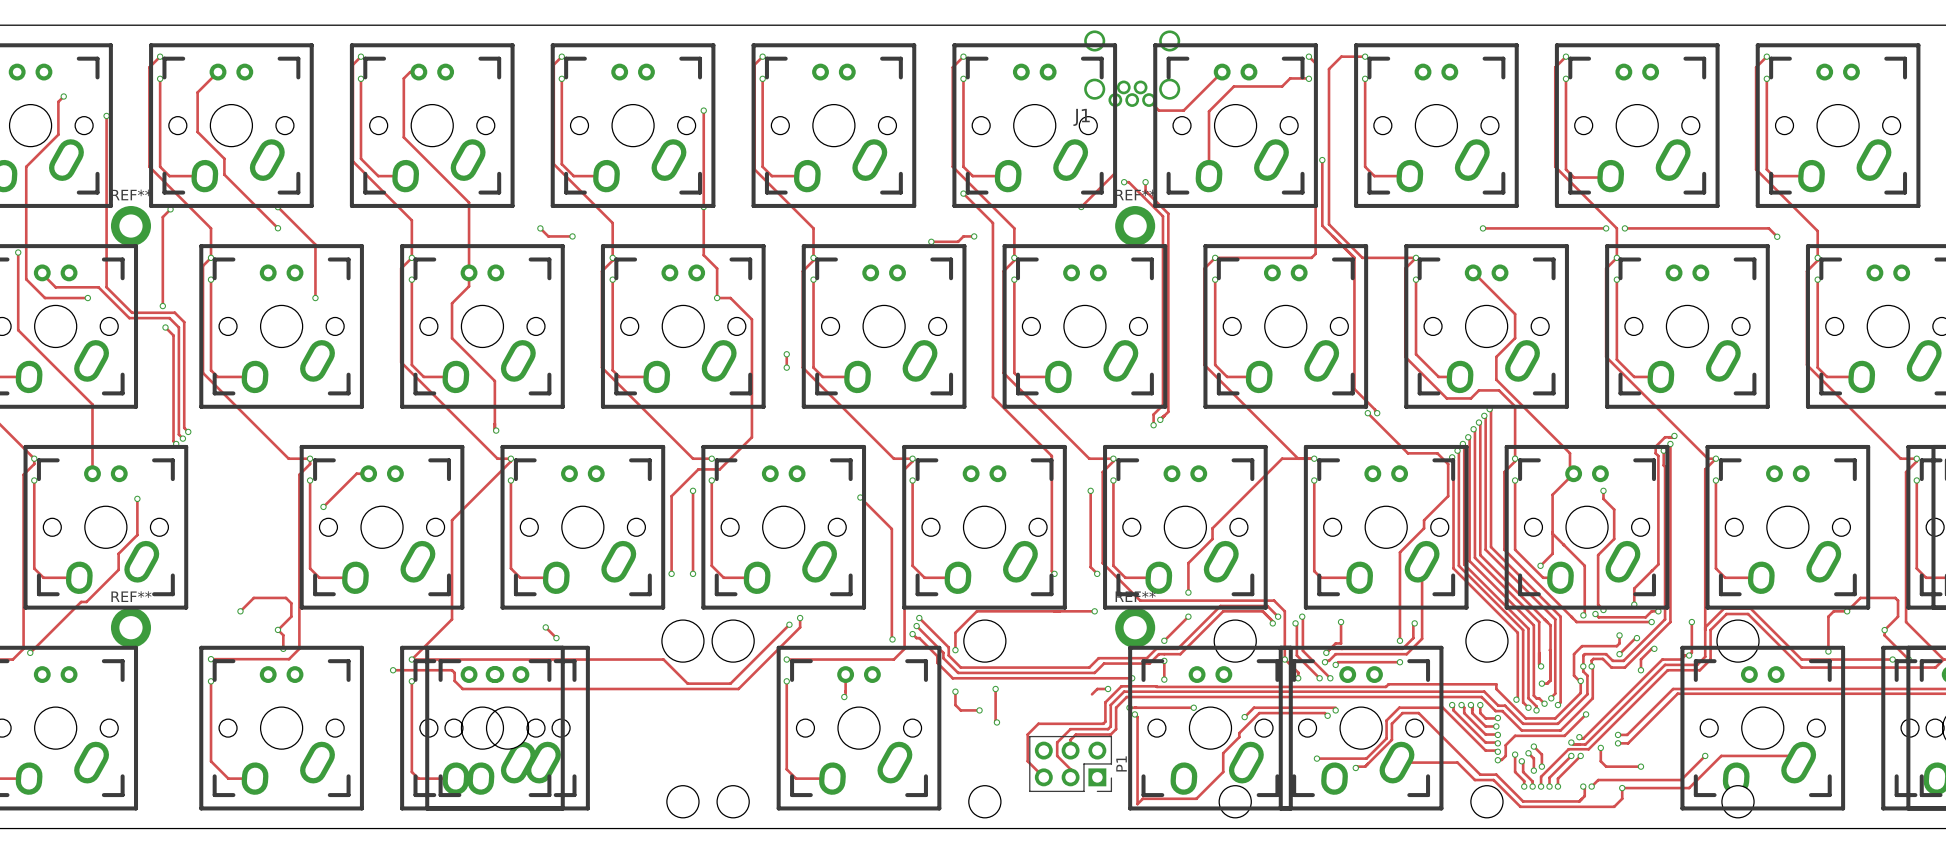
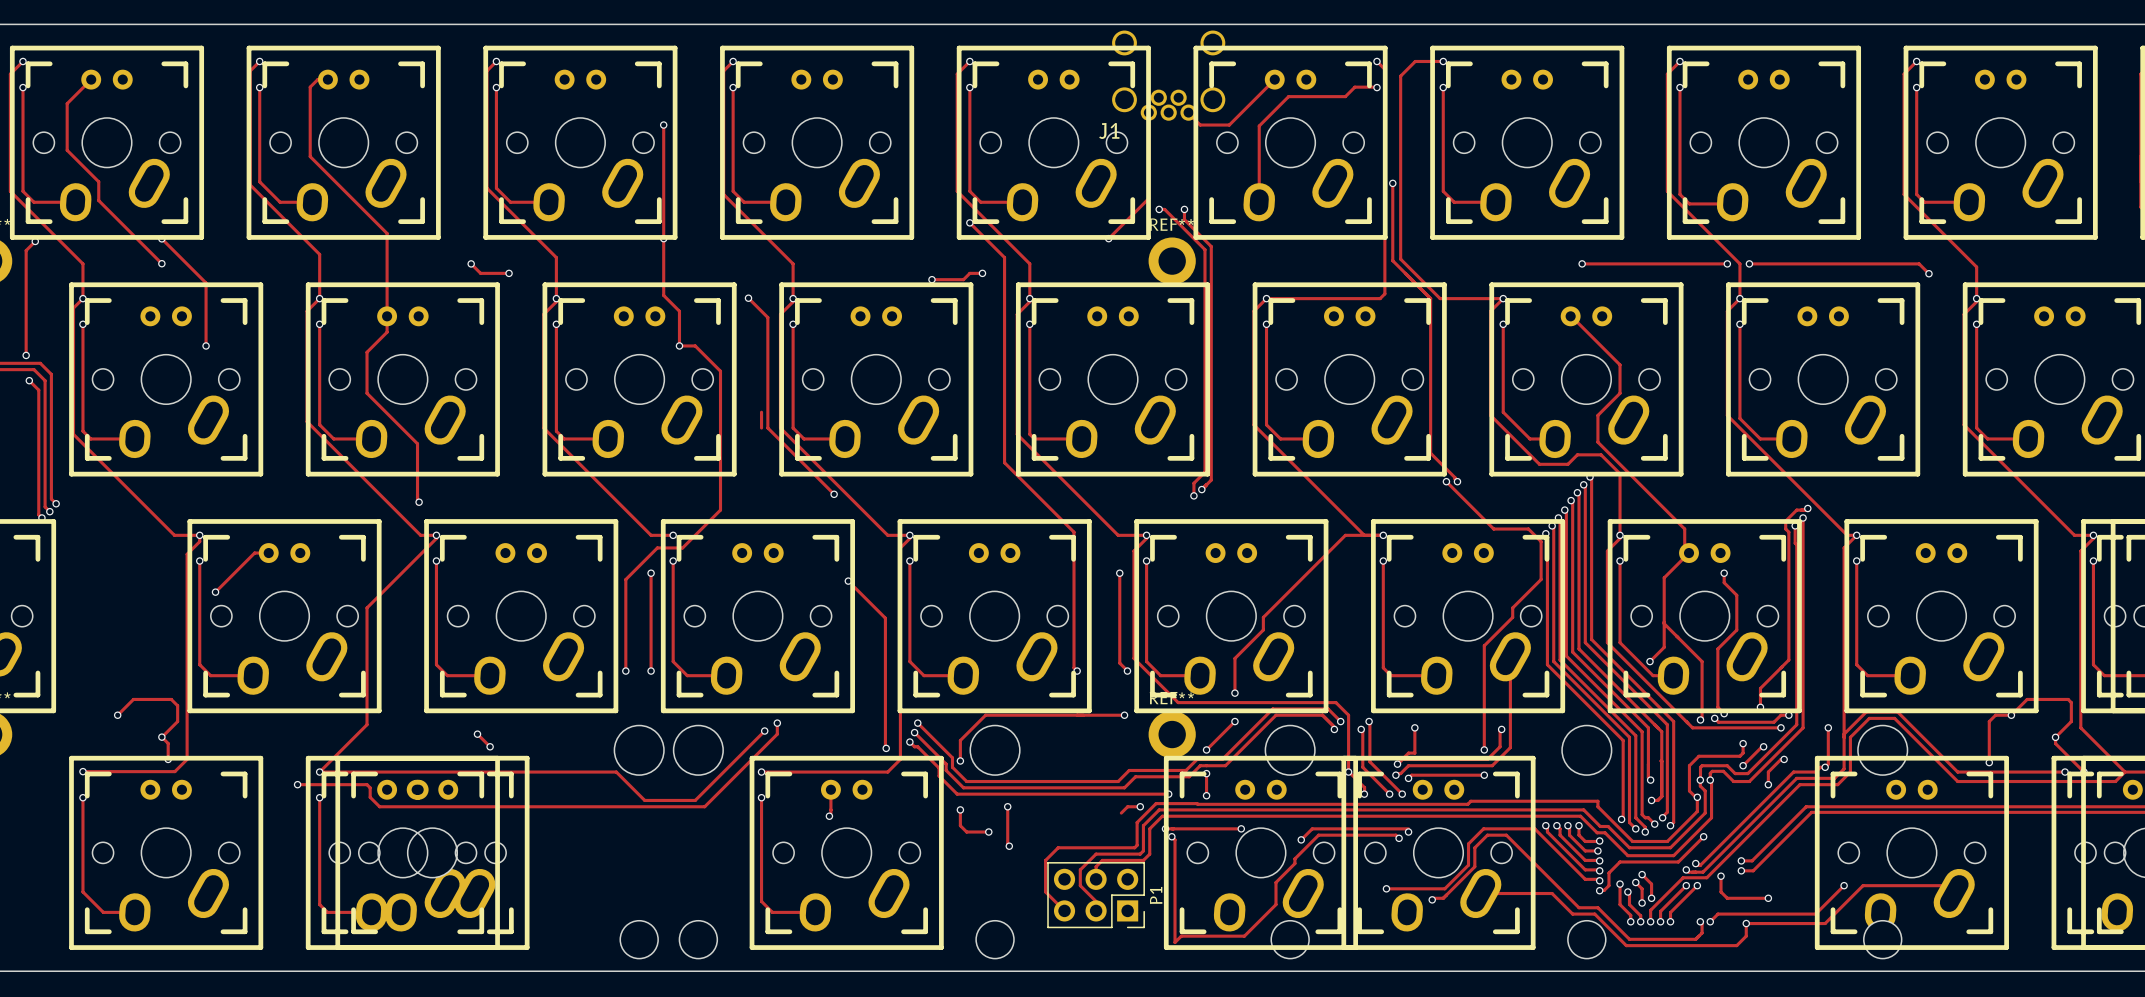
track: none -> (748, 298) (767, 317) (767, 428) (834, 494)
via: none -> (748, 298)
via: (786, 354) -> none
via: (786, 367) -> none
via: none -> (834, 494)

